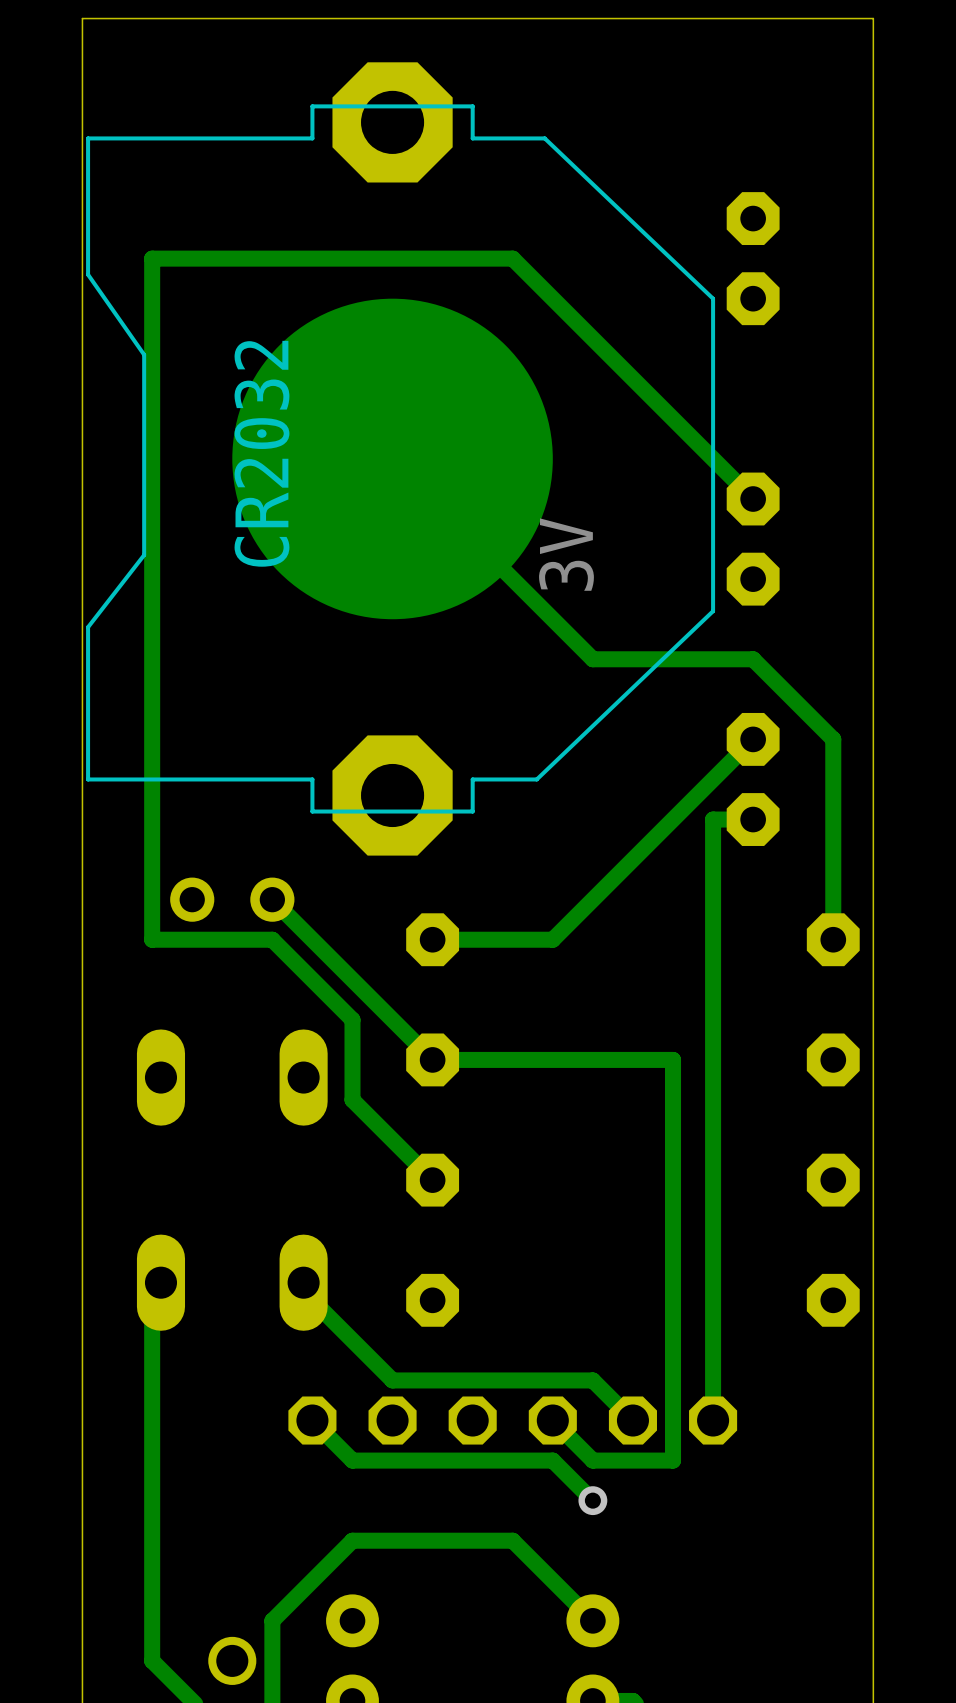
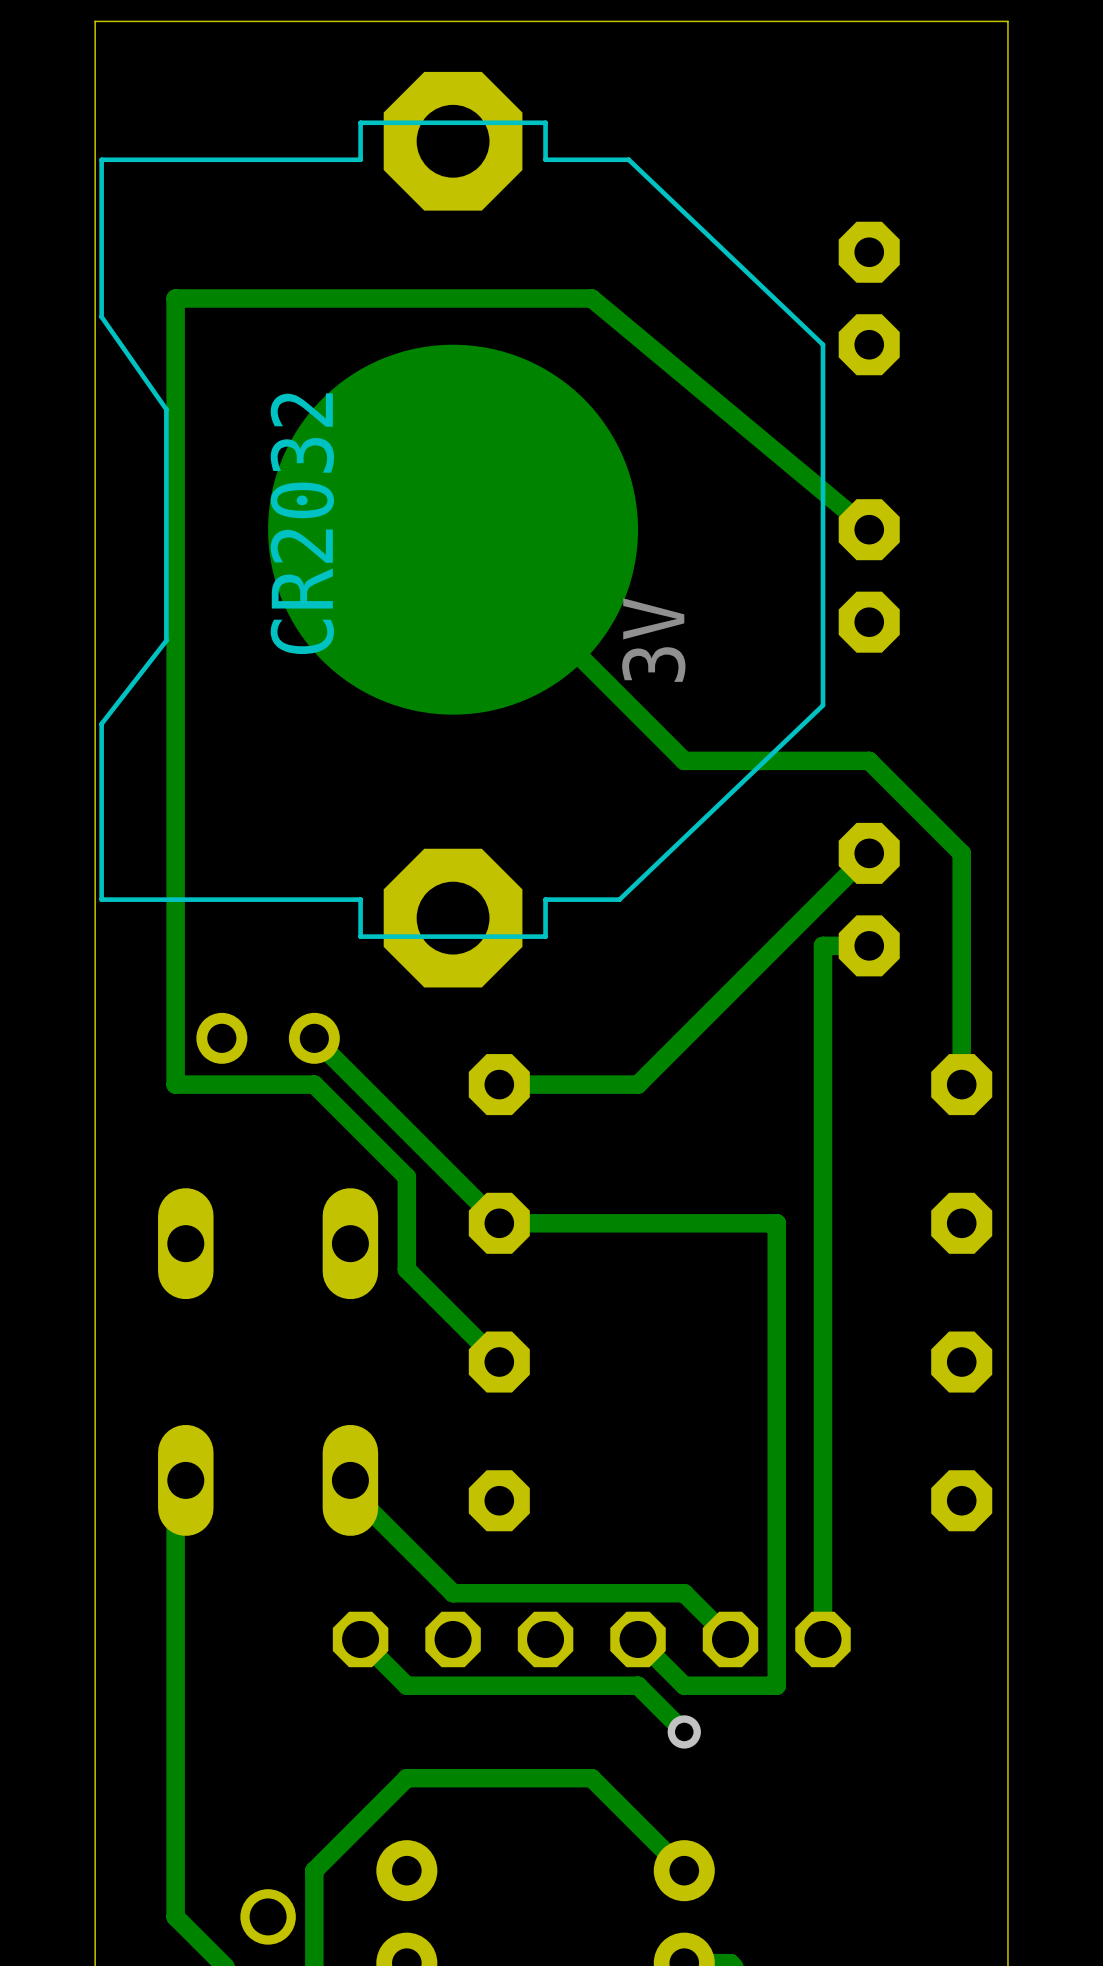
track: (512, 258) (753, 499) -> (591, 298) (869, 529)
part position: (753, 539) -> (869, 575)

